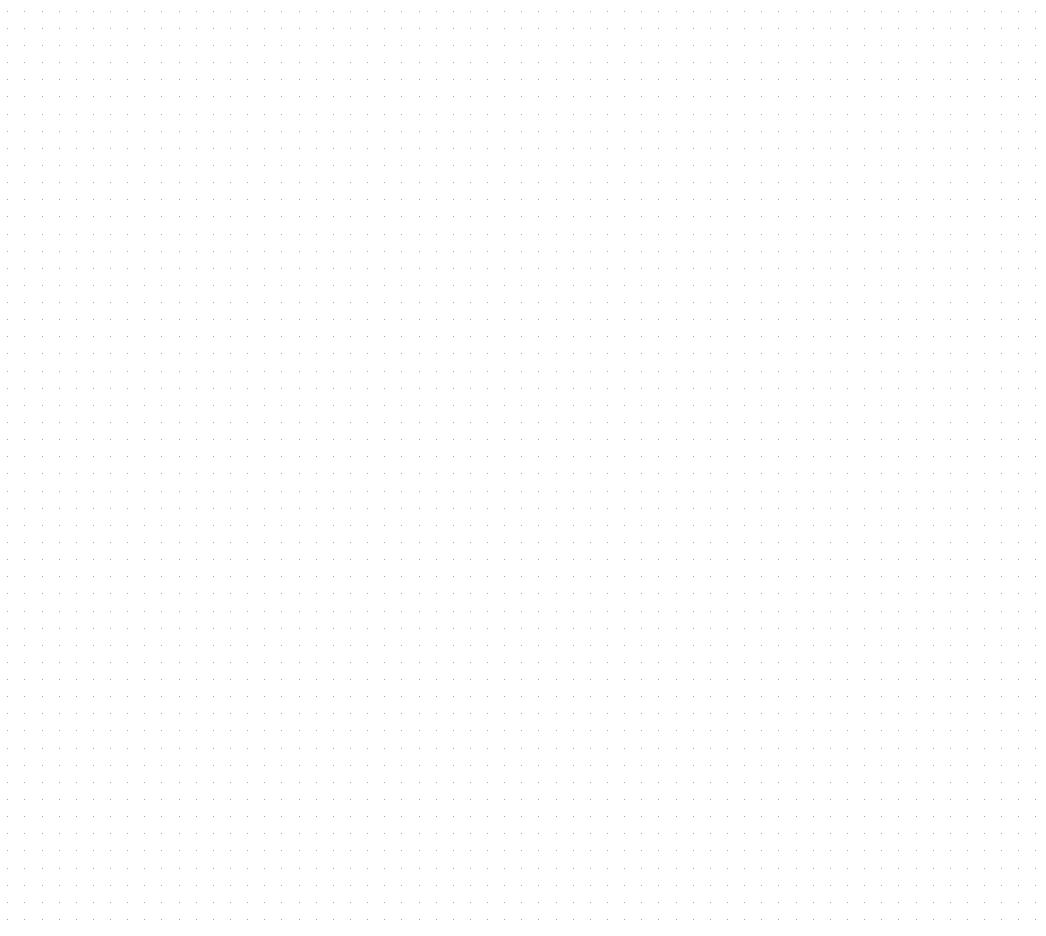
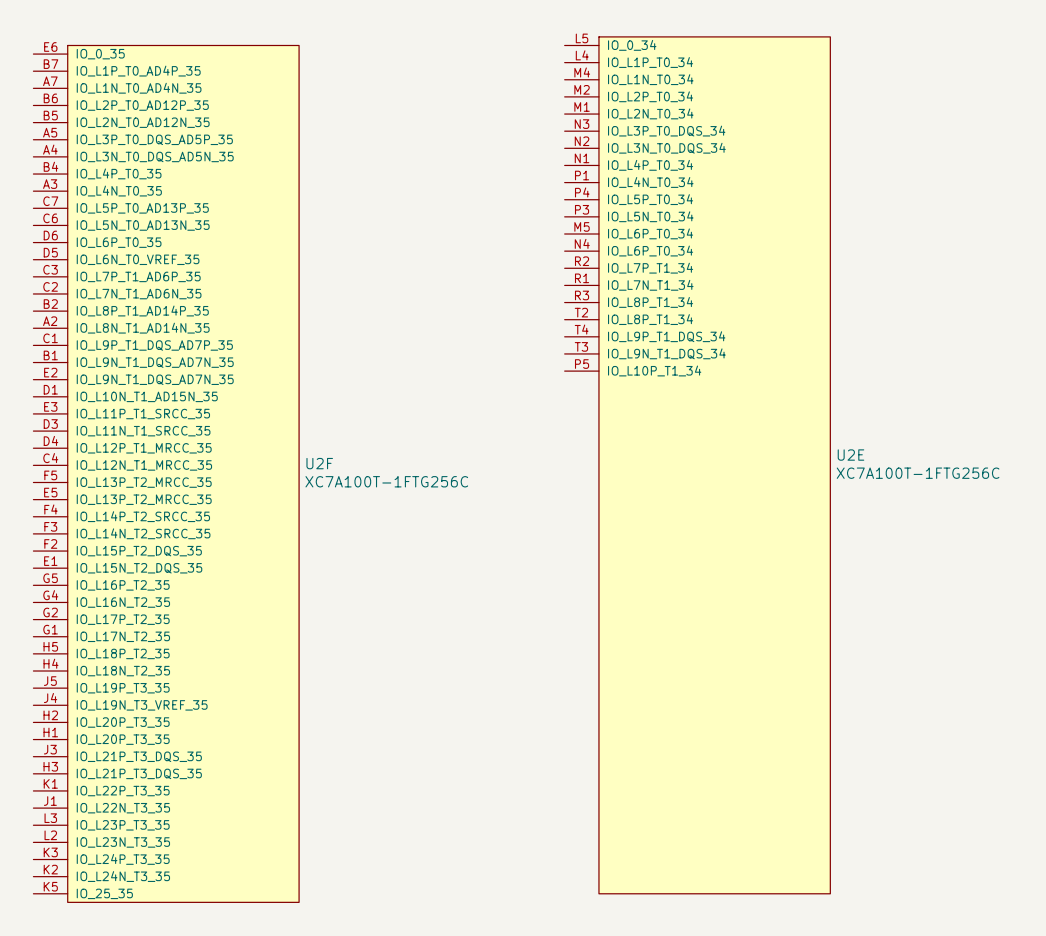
U2E: none -> XC7A100T-1FTG256C (697, 465)
U2F: none -> XC7A100T-1FTG256C (166, 473)

